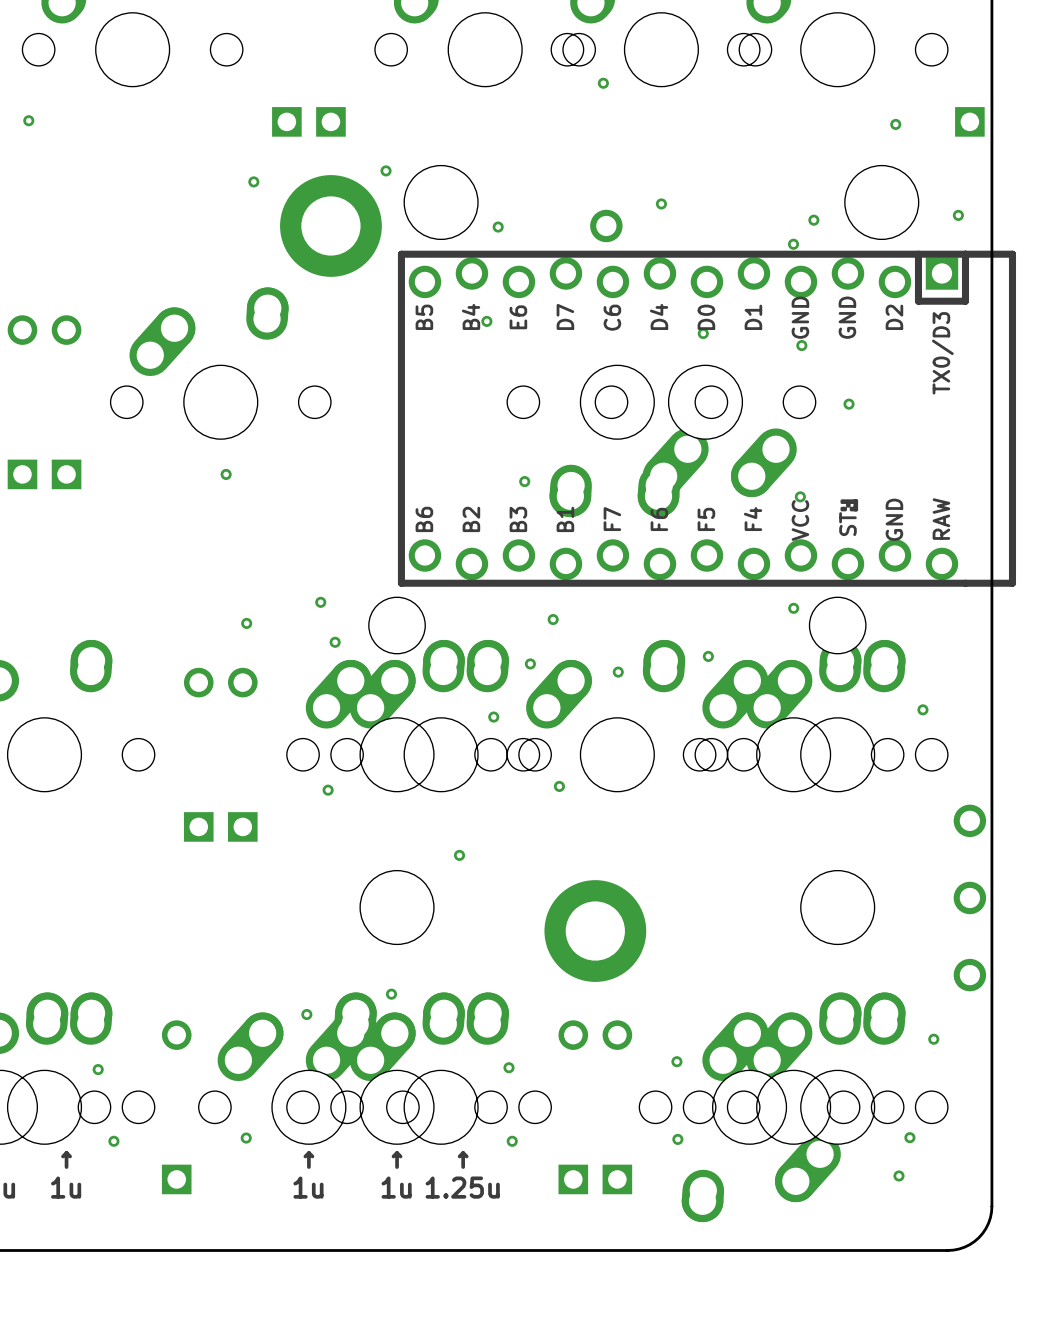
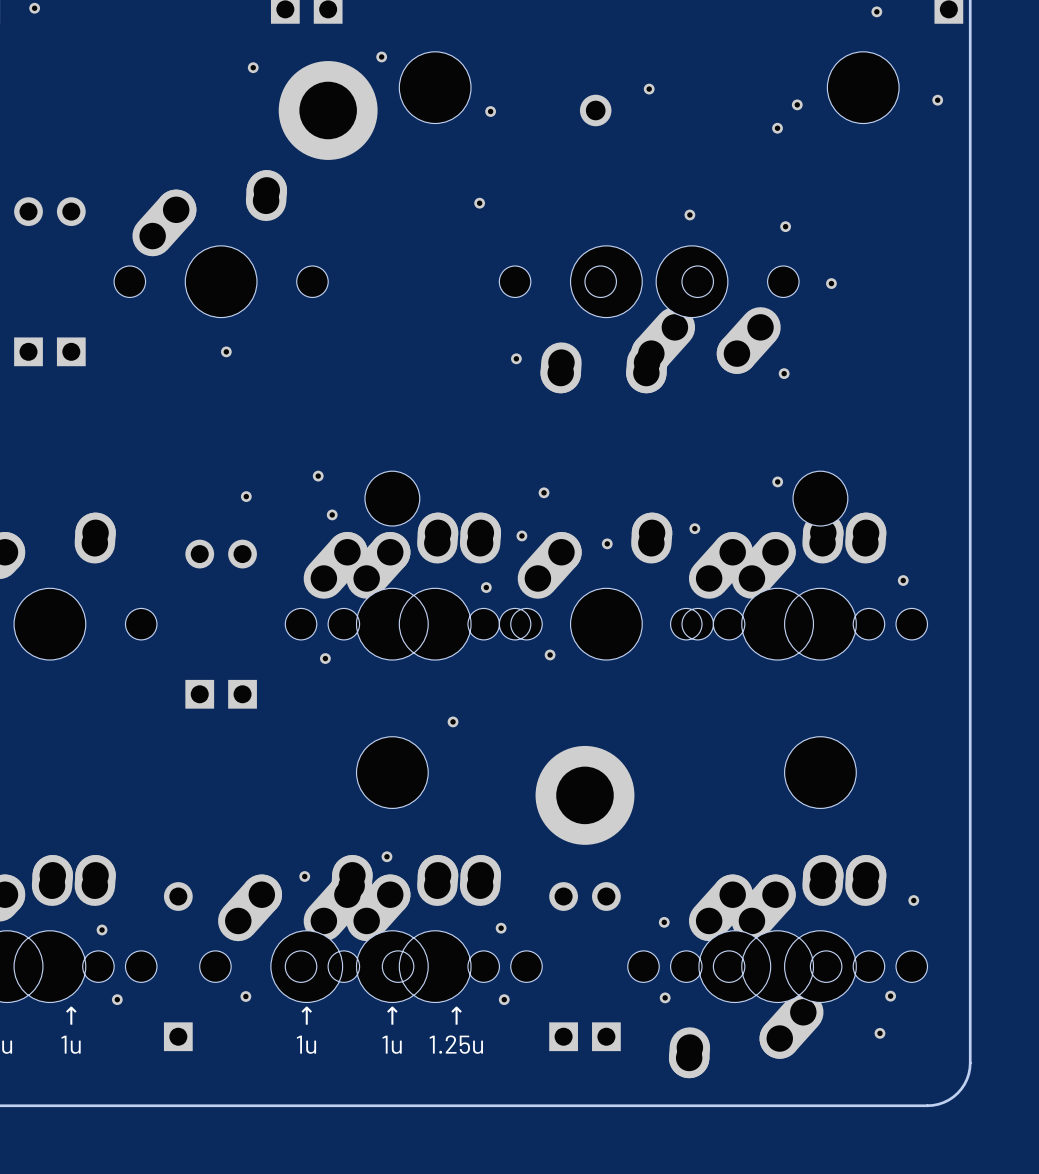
part: (706, 418) -> none
part: (969, 820) -> none
part: (969, 897) -> none
part: (969, 975) -> none

